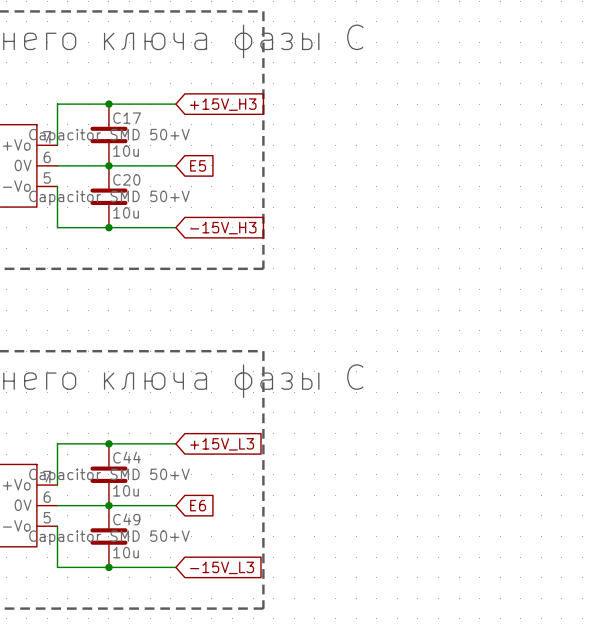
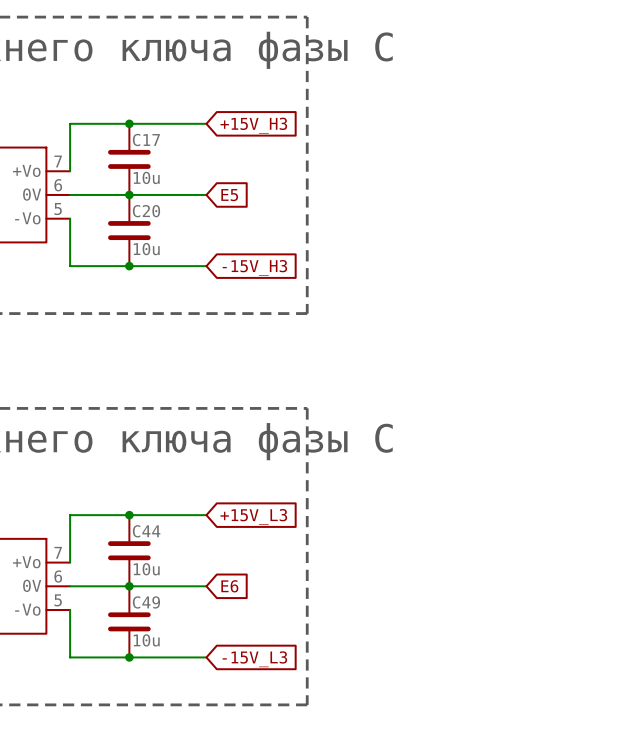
C17 text: Capacitor SMD 50+V (109, 136) -> none
C20 text: Capacitor SMD 50+V (109, 198) -> none
C44 text: Capacitor SMD 50+V (109, 476) -> none
C49 text: Capacitor SMD 50+V (109, 537) -> none

